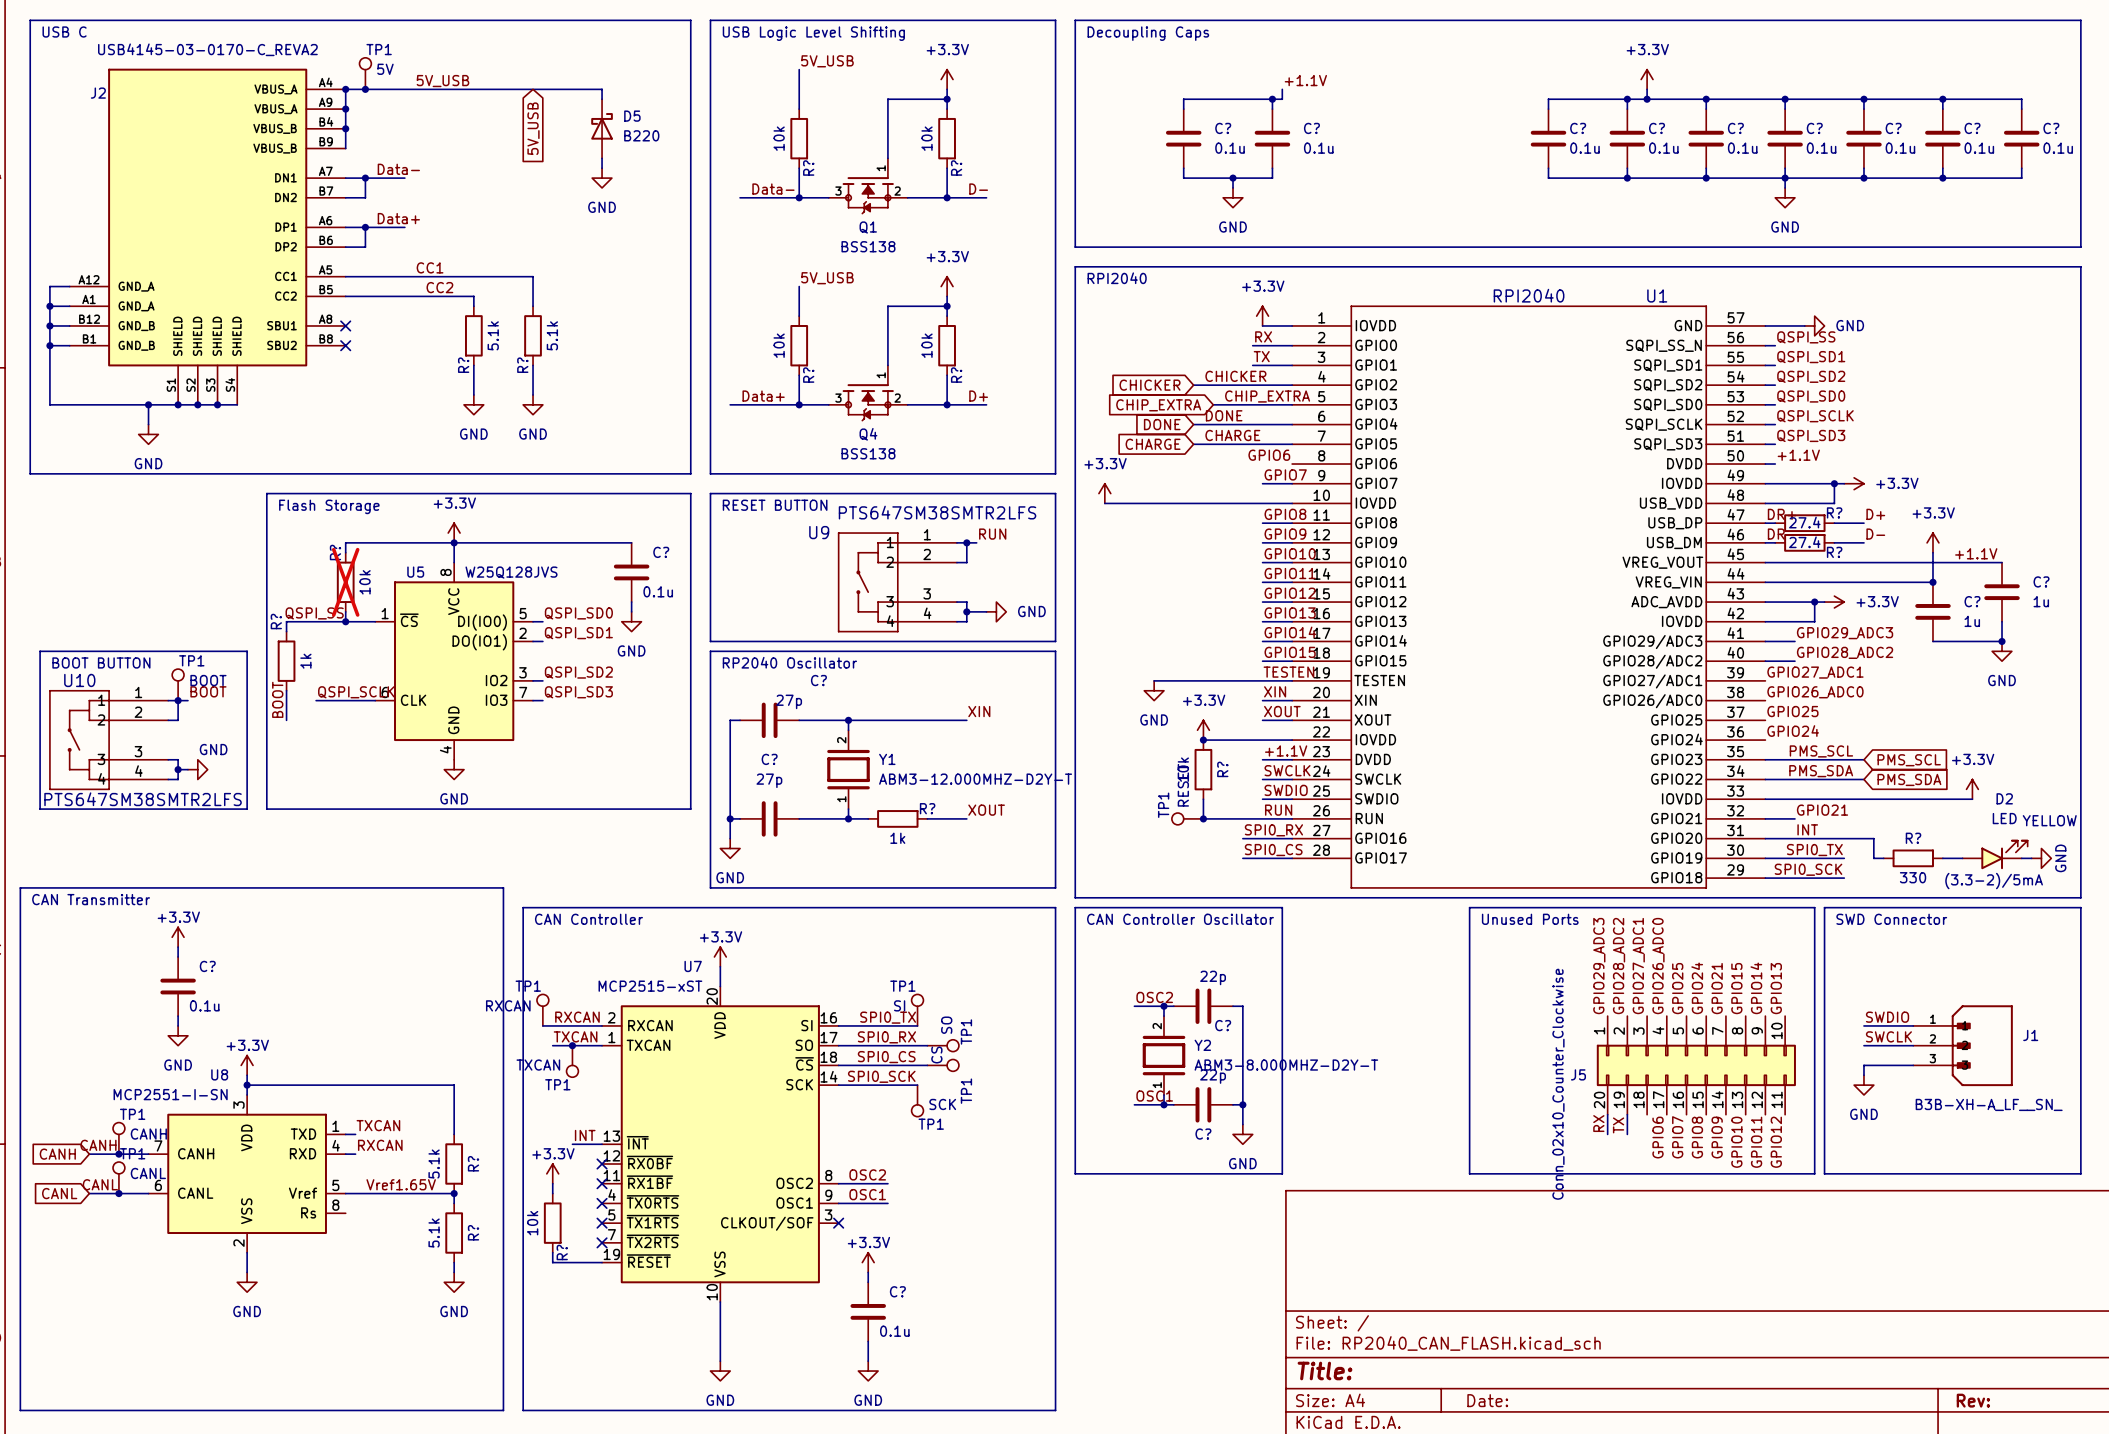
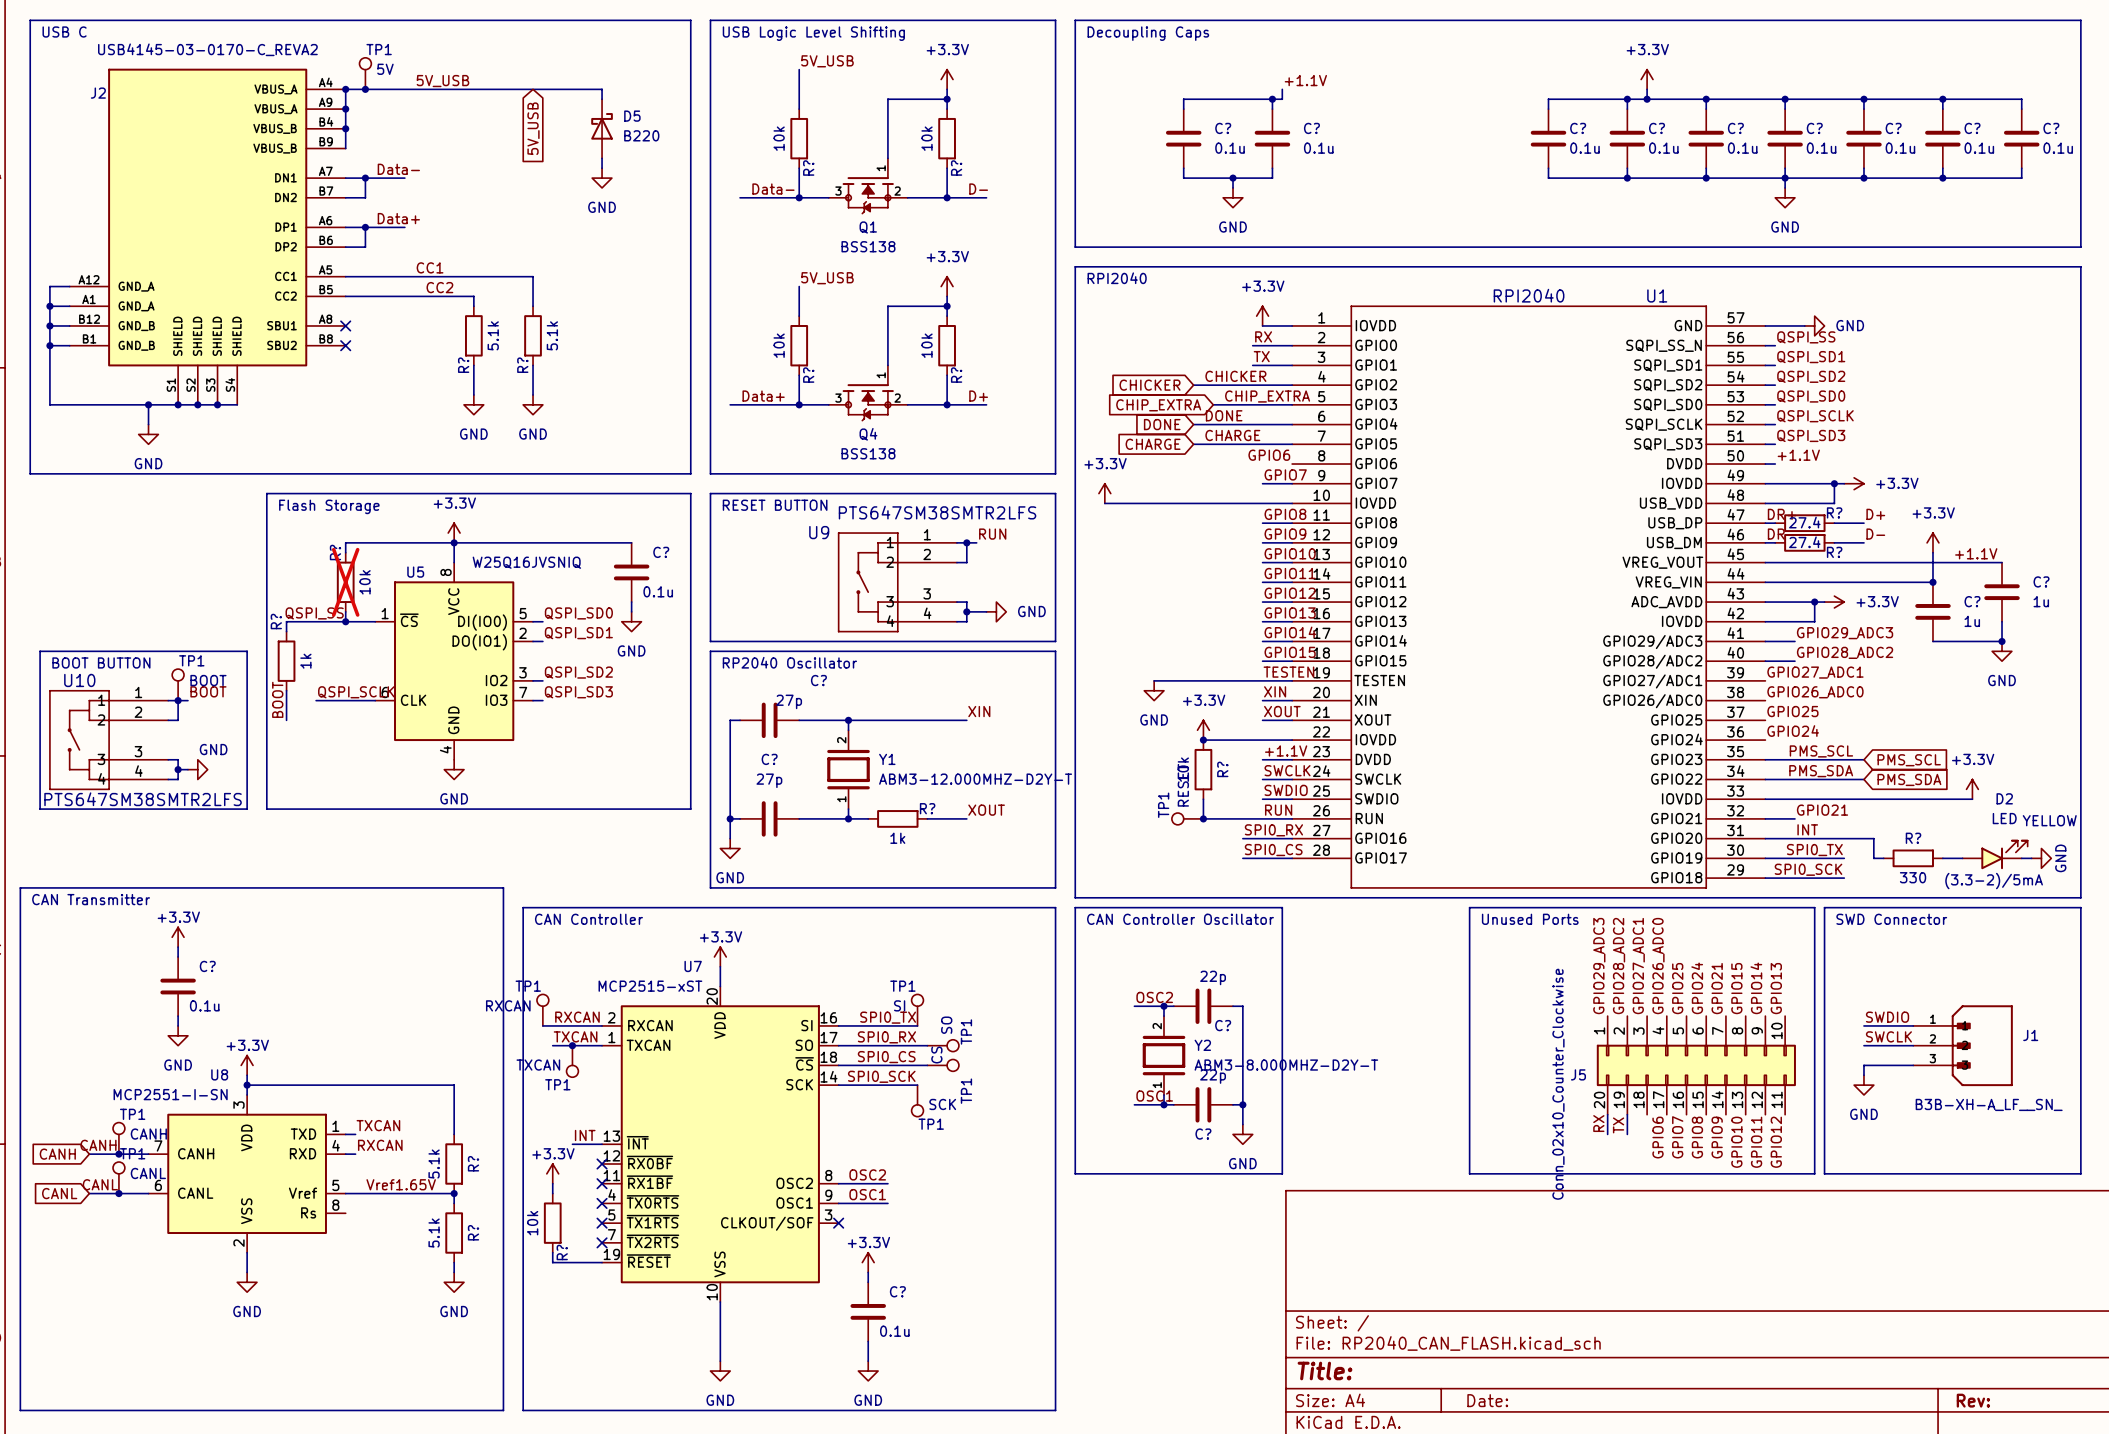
U5 value: W25Q128JVS (511, 572) -> W25Q16JVSNIQ (526, 562)

